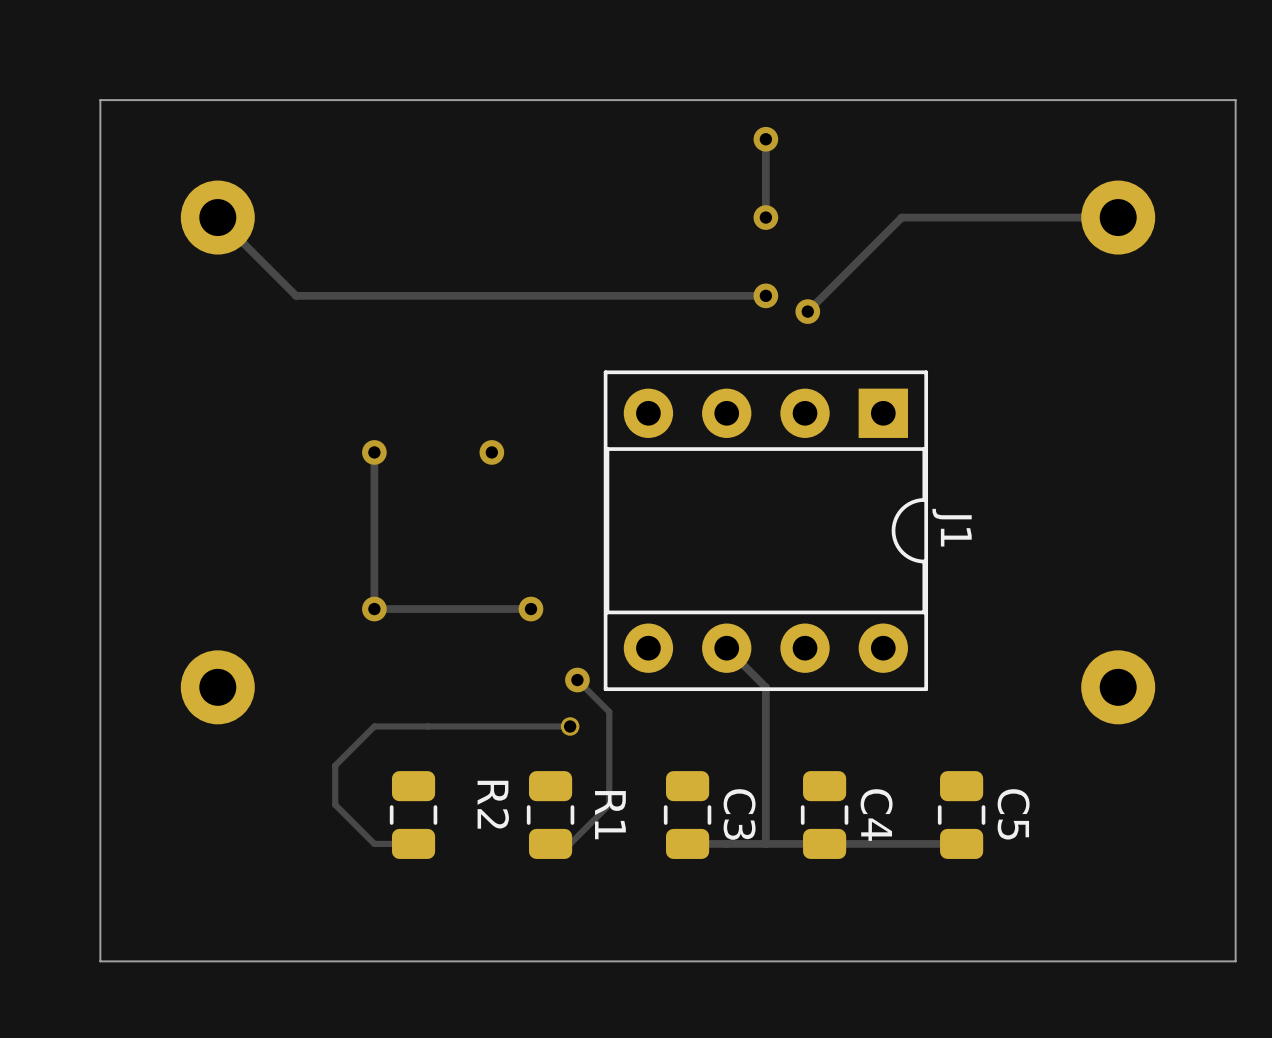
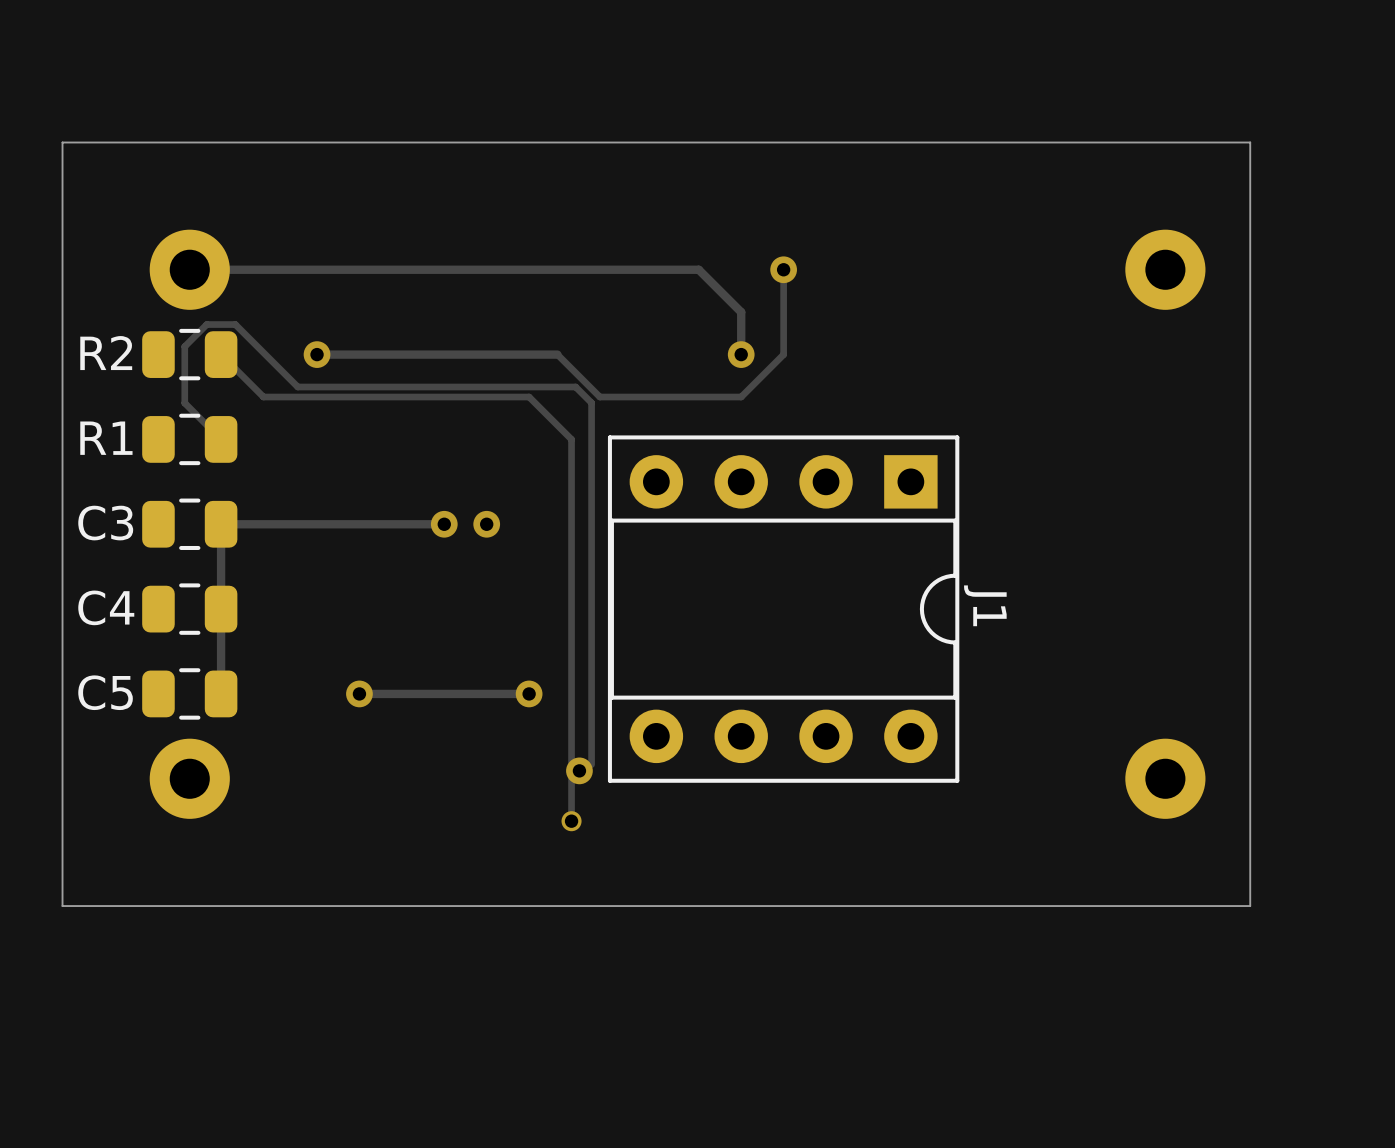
board edge: (1196, 100) (1235, 100) (1235, 961) (100, 961) (100, 804) -> (1250, 142) (1250, 906) (62, 906)
track: (765, 139) (765, 217) -> none
via: (765, 139) -> none
track: (217, 217) (296, 295) (335, 295) -> (189, 269) (698, 269) (741, 312) (741, 354)
track: (1118, 217) (901, 217) (807, 311) -> none
via: none -> (317, 354)
track: (765, 295) (557, 295) -> (783, 269) (783, 354) (741, 397) (599, 397) (557, 354)
via position: (765, 295) -> (741, 354)
via: (807, 311) -> none
track: none -> (221, 439) (184, 403) (184, 346) (206, 324) (235, 324) (297, 386) (575, 386) (591, 402) (591, 764)
track: (374, 452) (374, 609) -> none
via position: (374, 452) -> (444, 524)
track: none -> (444, 524) (221, 524) (221, 693)
track: (726, 648) (765, 687) (765, 843) -> none
track: (577, 680) (609, 711) (609, 804) (570, 843) (550, 843) -> none
track: (570, 726) (374, 726) (335, 765) (335, 804) (374, 843) (413, 843) -> (571, 821) (571, 439) (529, 397) (263, 397) (221, 354)
R2 name position: R2 (493, 804) -> R2 (106, 353)
C3 name position: C3 (739, 814) -> C3 (105, 523)
C5 name position: C5 (1013, 814) -> C5 (105, 692)
R2 rotation: 0° (413, 815) -> 90° clockwise (189, 354)
R2 position: (413, 815) -> (189, 354)
R1 rotation: 0° (550, 815) -> 90° clockwise (189, 439)
R1 position: (550, 815) -> (189, 439)
R1 name position: R1 (610, 815) -> R1 (106, 438)
C3 rotation: 0° (687, 815) -> 90° clockwise (189, 524)
C3 position: (687, 815) -> (189, 524)
C4 rotation: 0° (824, 815) -> 90° clockwise (189, 609)
C4 position: (824, 815) -> (189, 609)
C4 name position: C4 (876, 815) -> C4 (106, 607)
C5 rotation: 0° (961, 815) -> 90° clockwise (189, 693)
C5 position: (961, 815) -> (189, 693)
track: (961, 843) (687, 843) -> none

